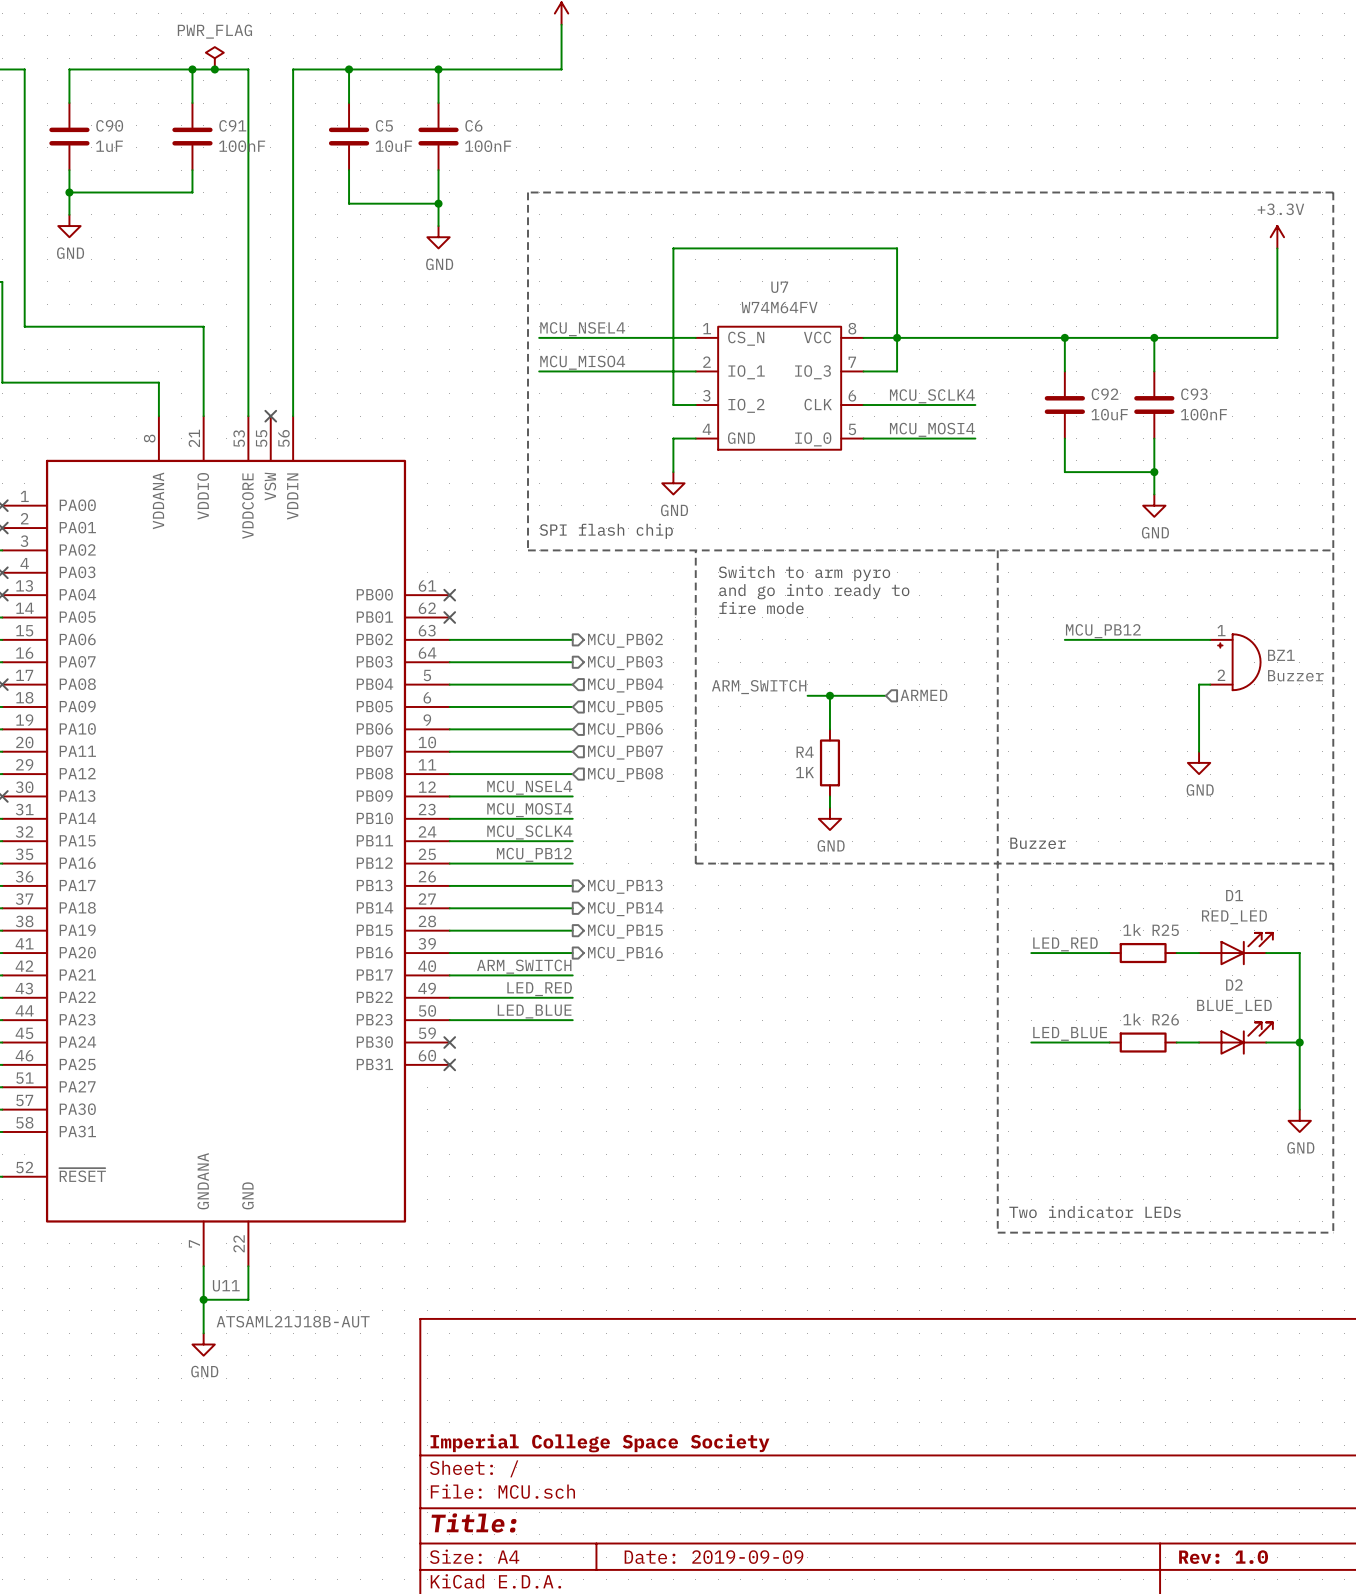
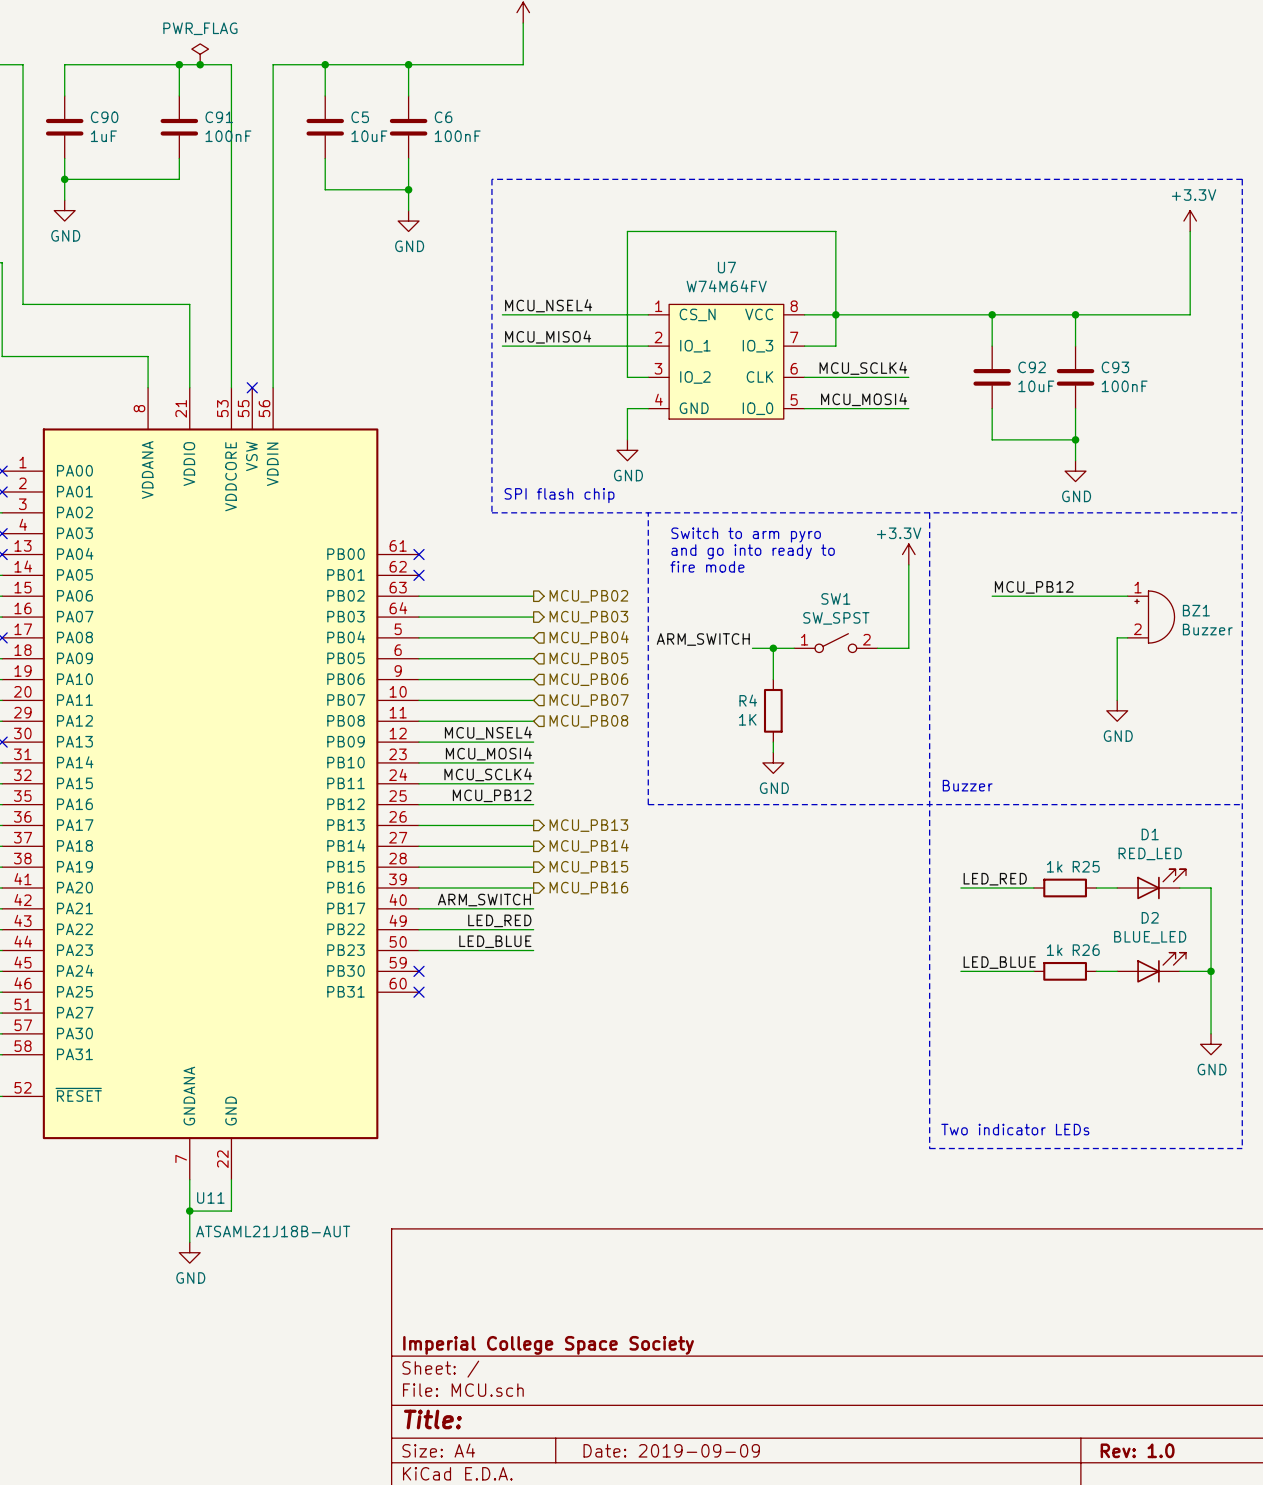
power symbol: none -> +3.3V (908, 554)
wire: none -> (908, 564) (908, 648) (877, 648)
SW1: none -> SW_SPST (835, 643)
hierarchical label: ARMED (923, 695) -> none

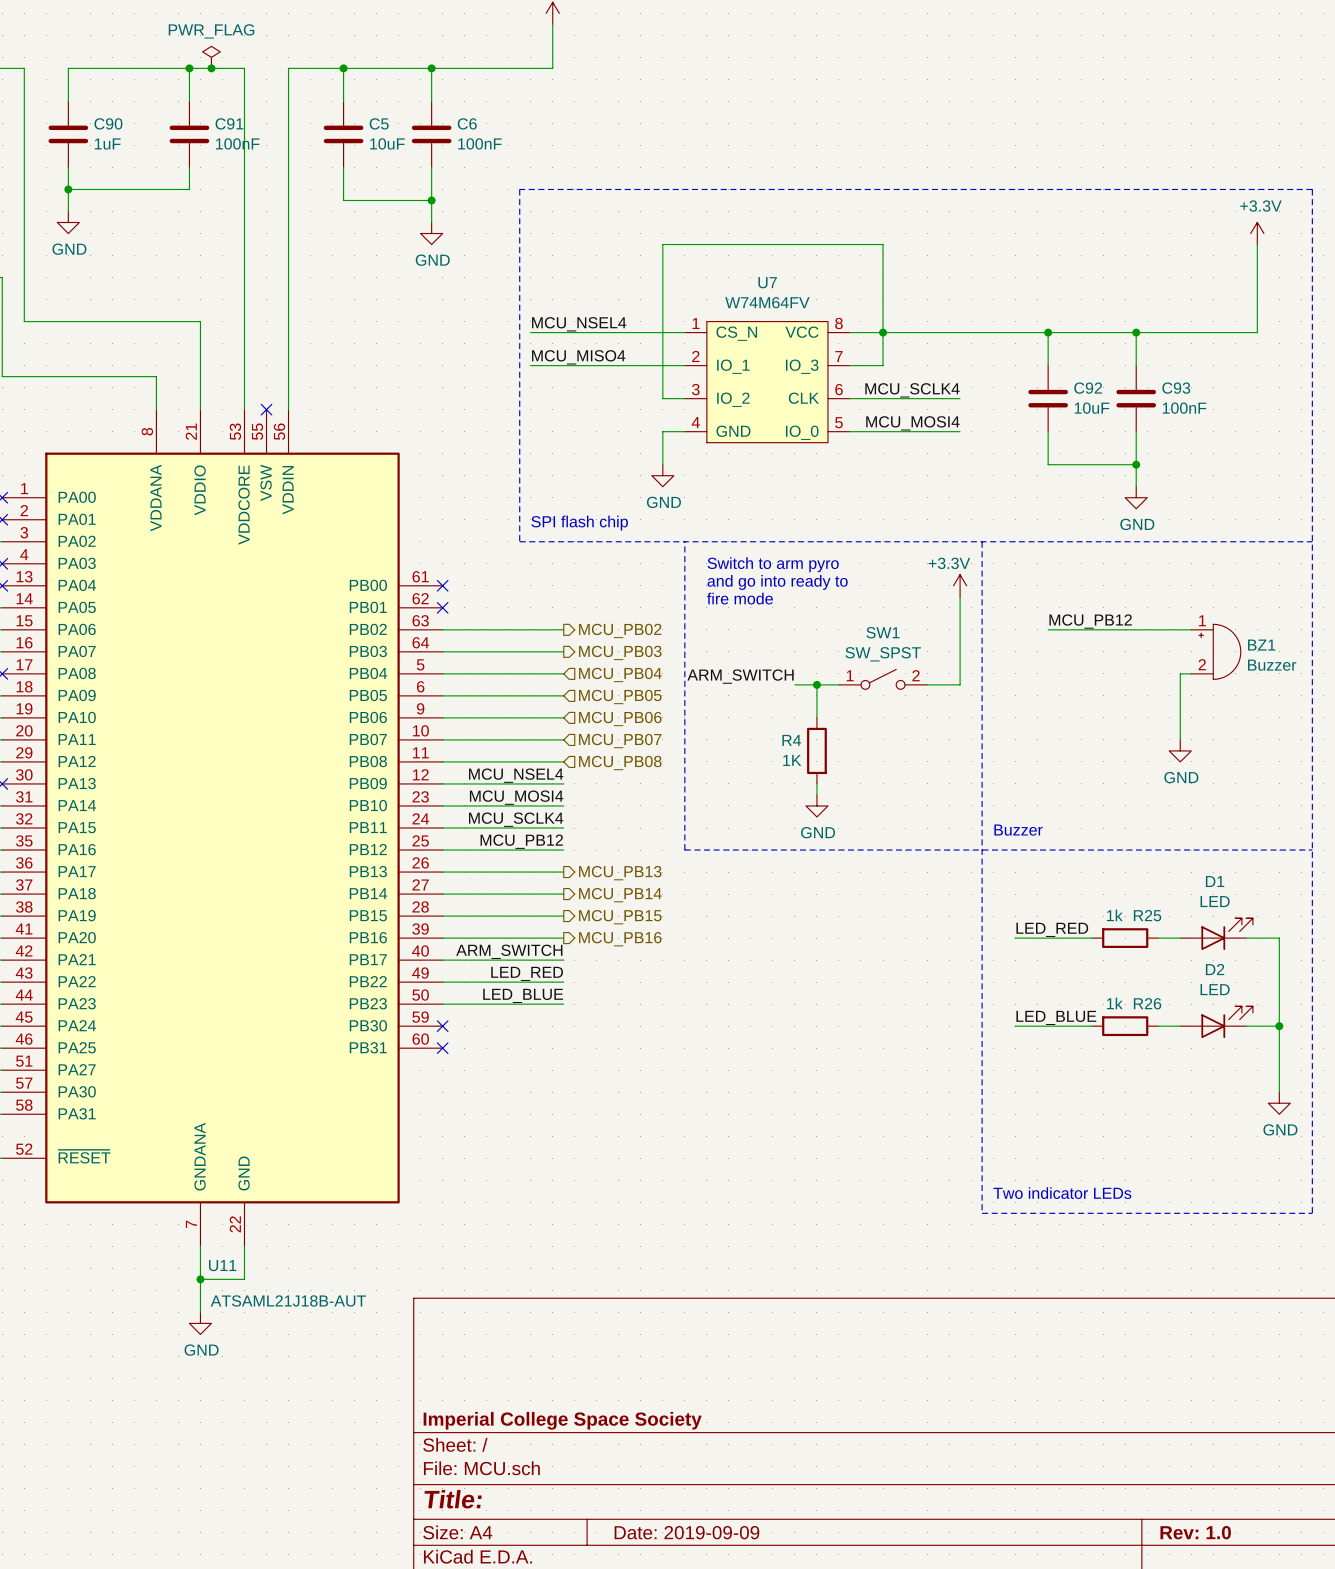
D1 value: RED_LED (1150, 853) -> LED (1215, 901)
D2 value: BLUE_LED (1150, 937) -> LED (1215, 989)

